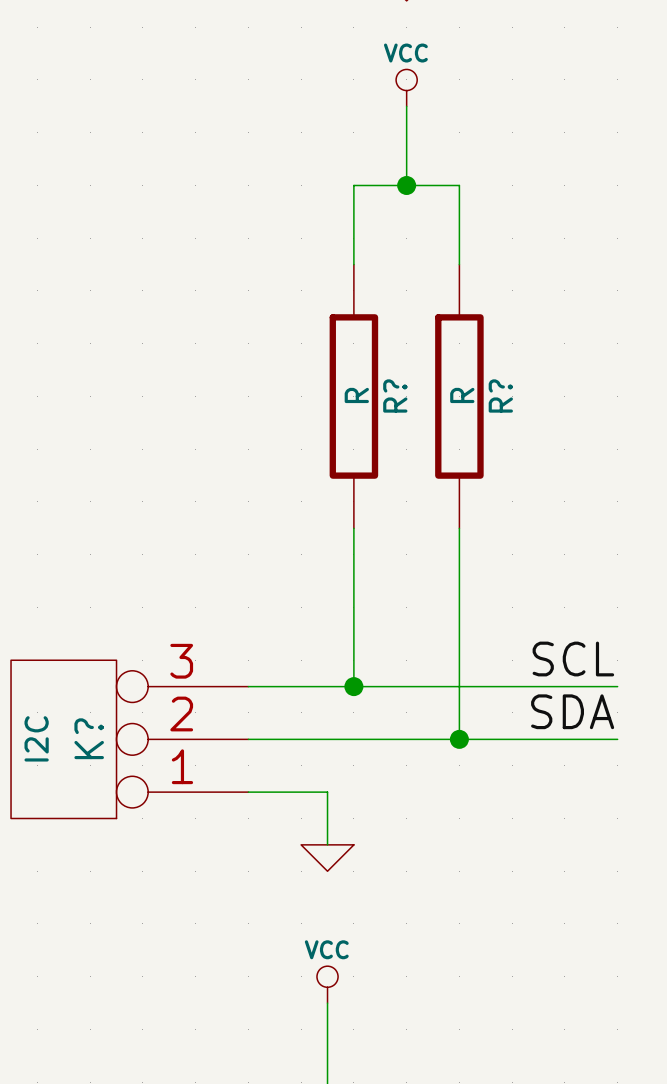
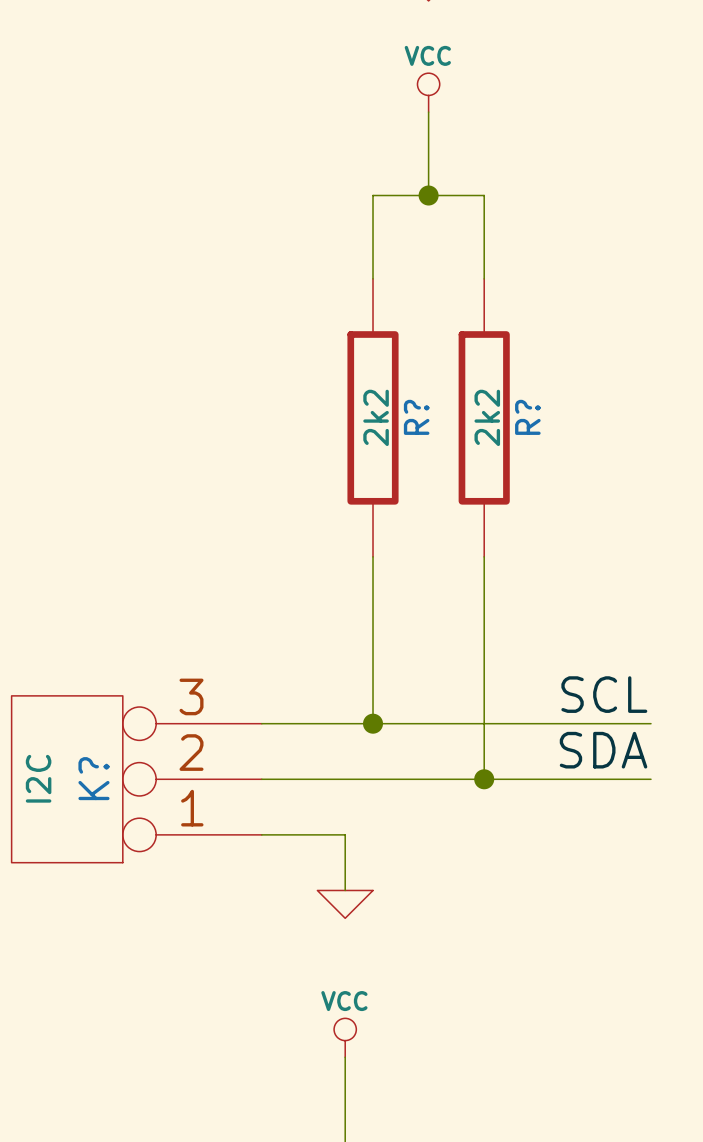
R? value: R (356, 395) -> 2k2 (376, 417)
R? value: R (462, 395) -> 2k2 (487, 417)

